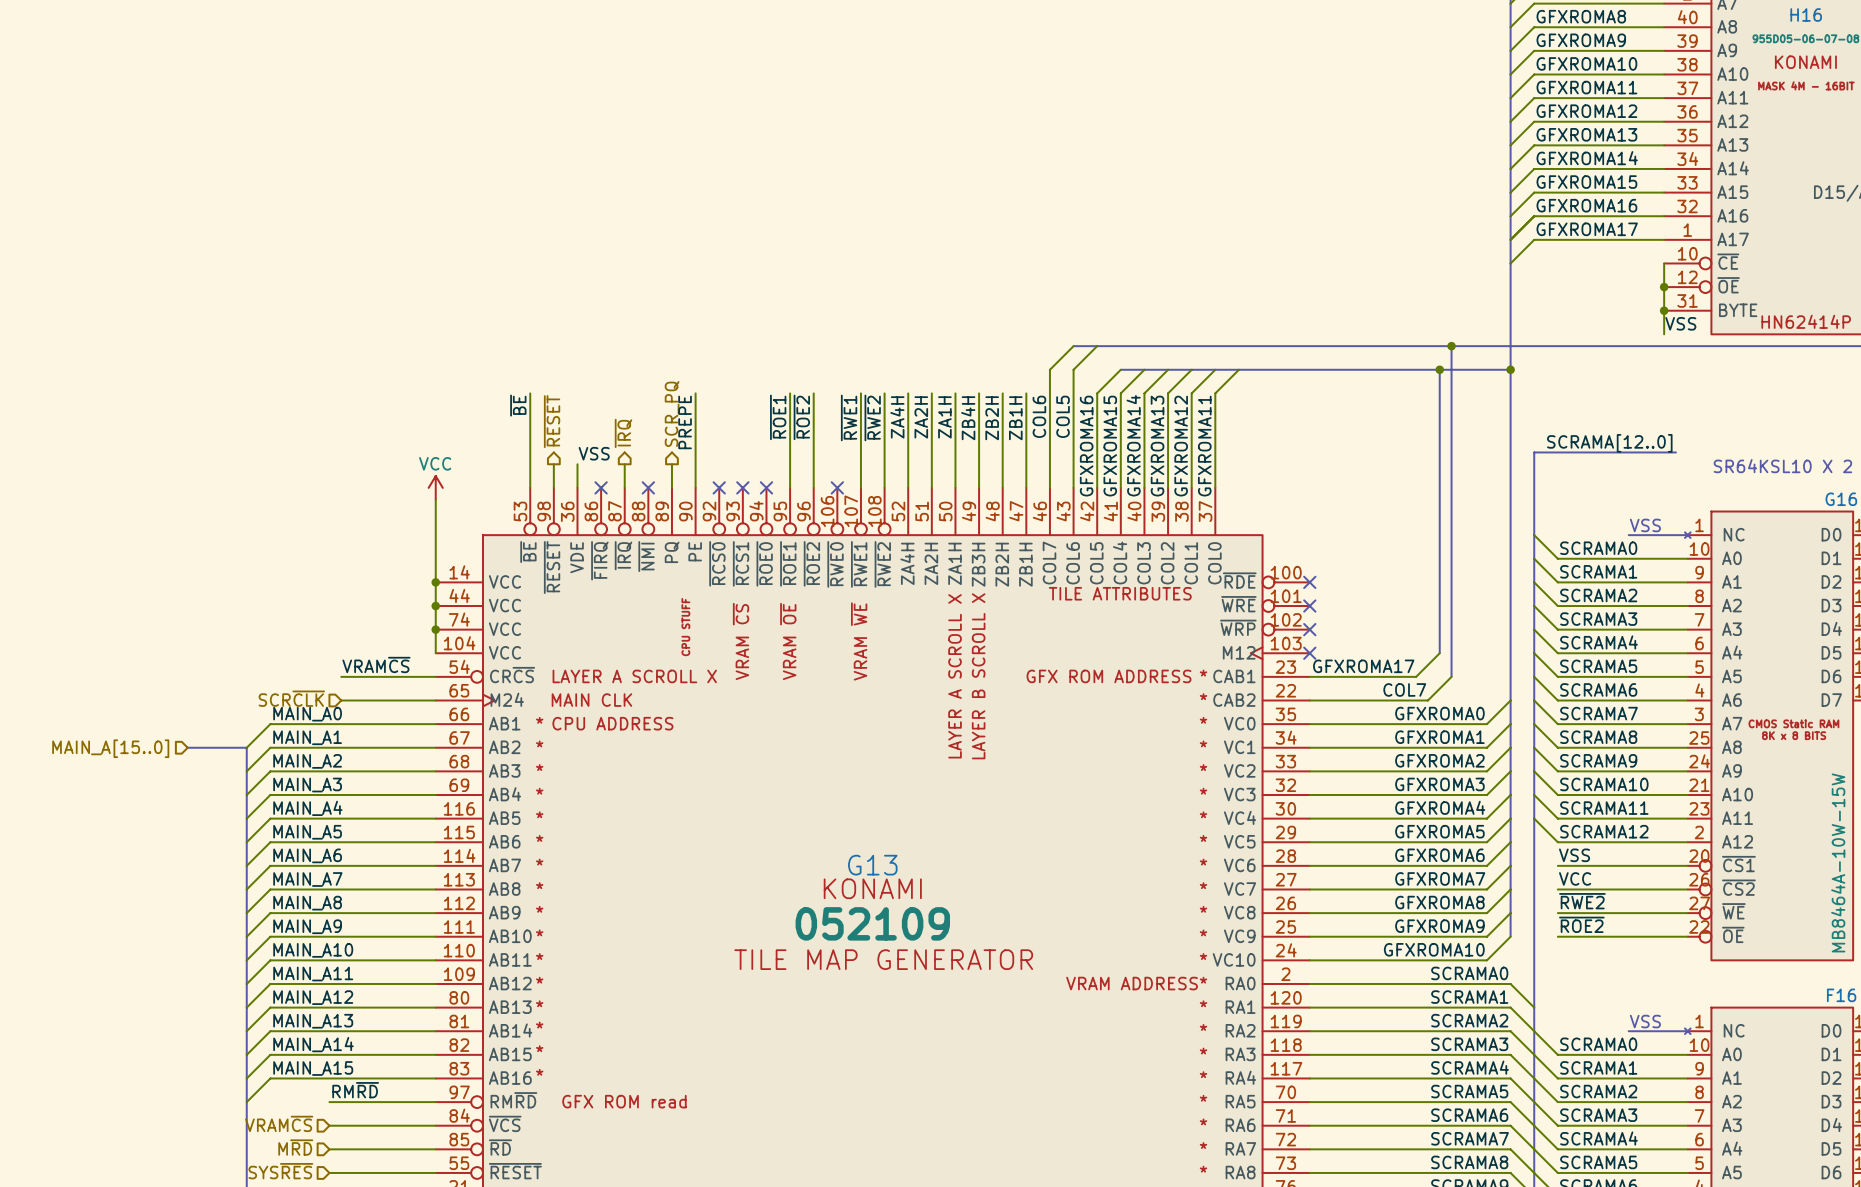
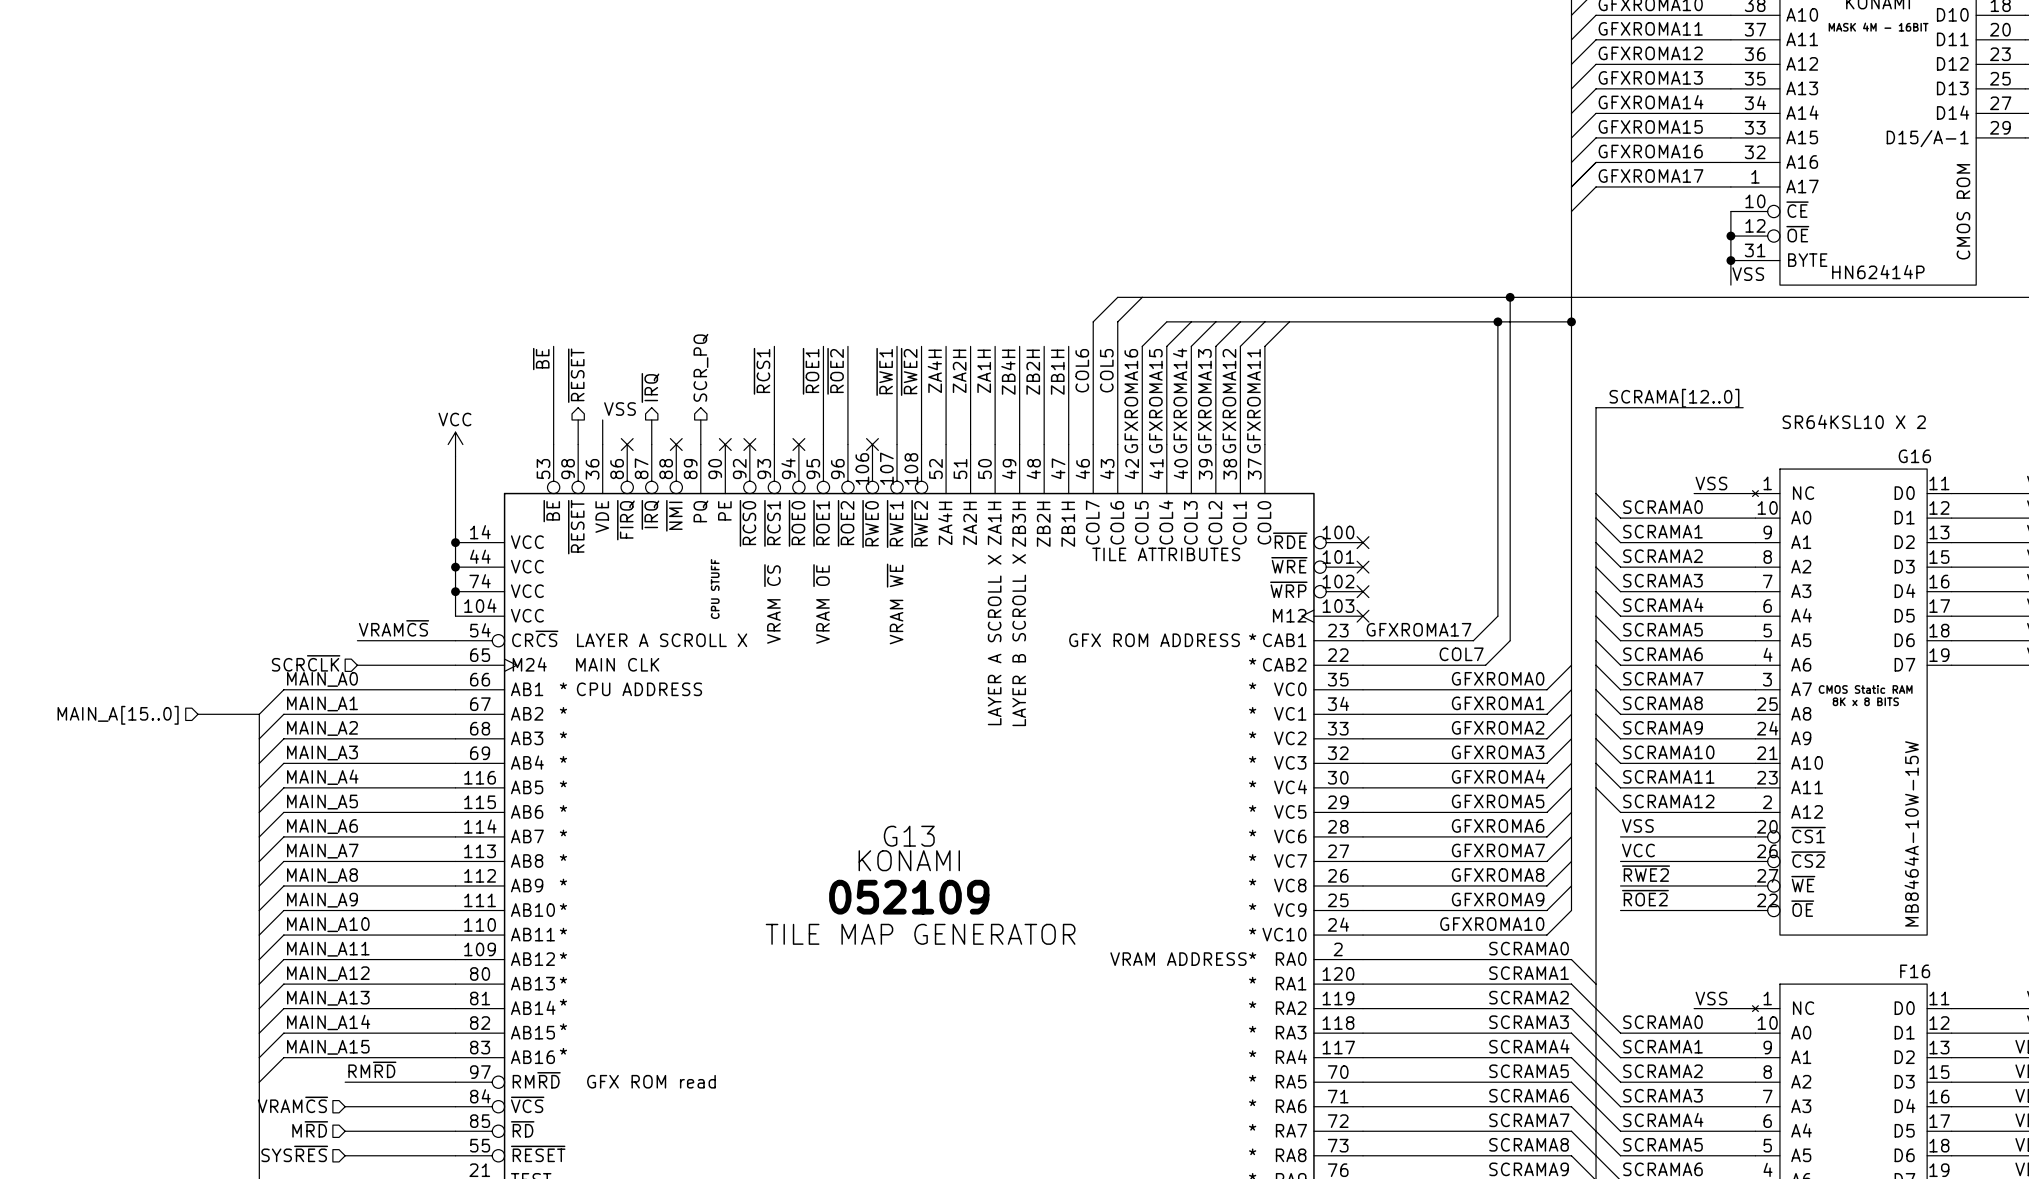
wire: (695, 393) (695, 487) -> (774, 346) (774, 444)
label: none -> ~{RCS1} (762, 371)
label: PREPE (685, 422) -> none
no-connect mark position: (742, 487) -> (725, 444)

